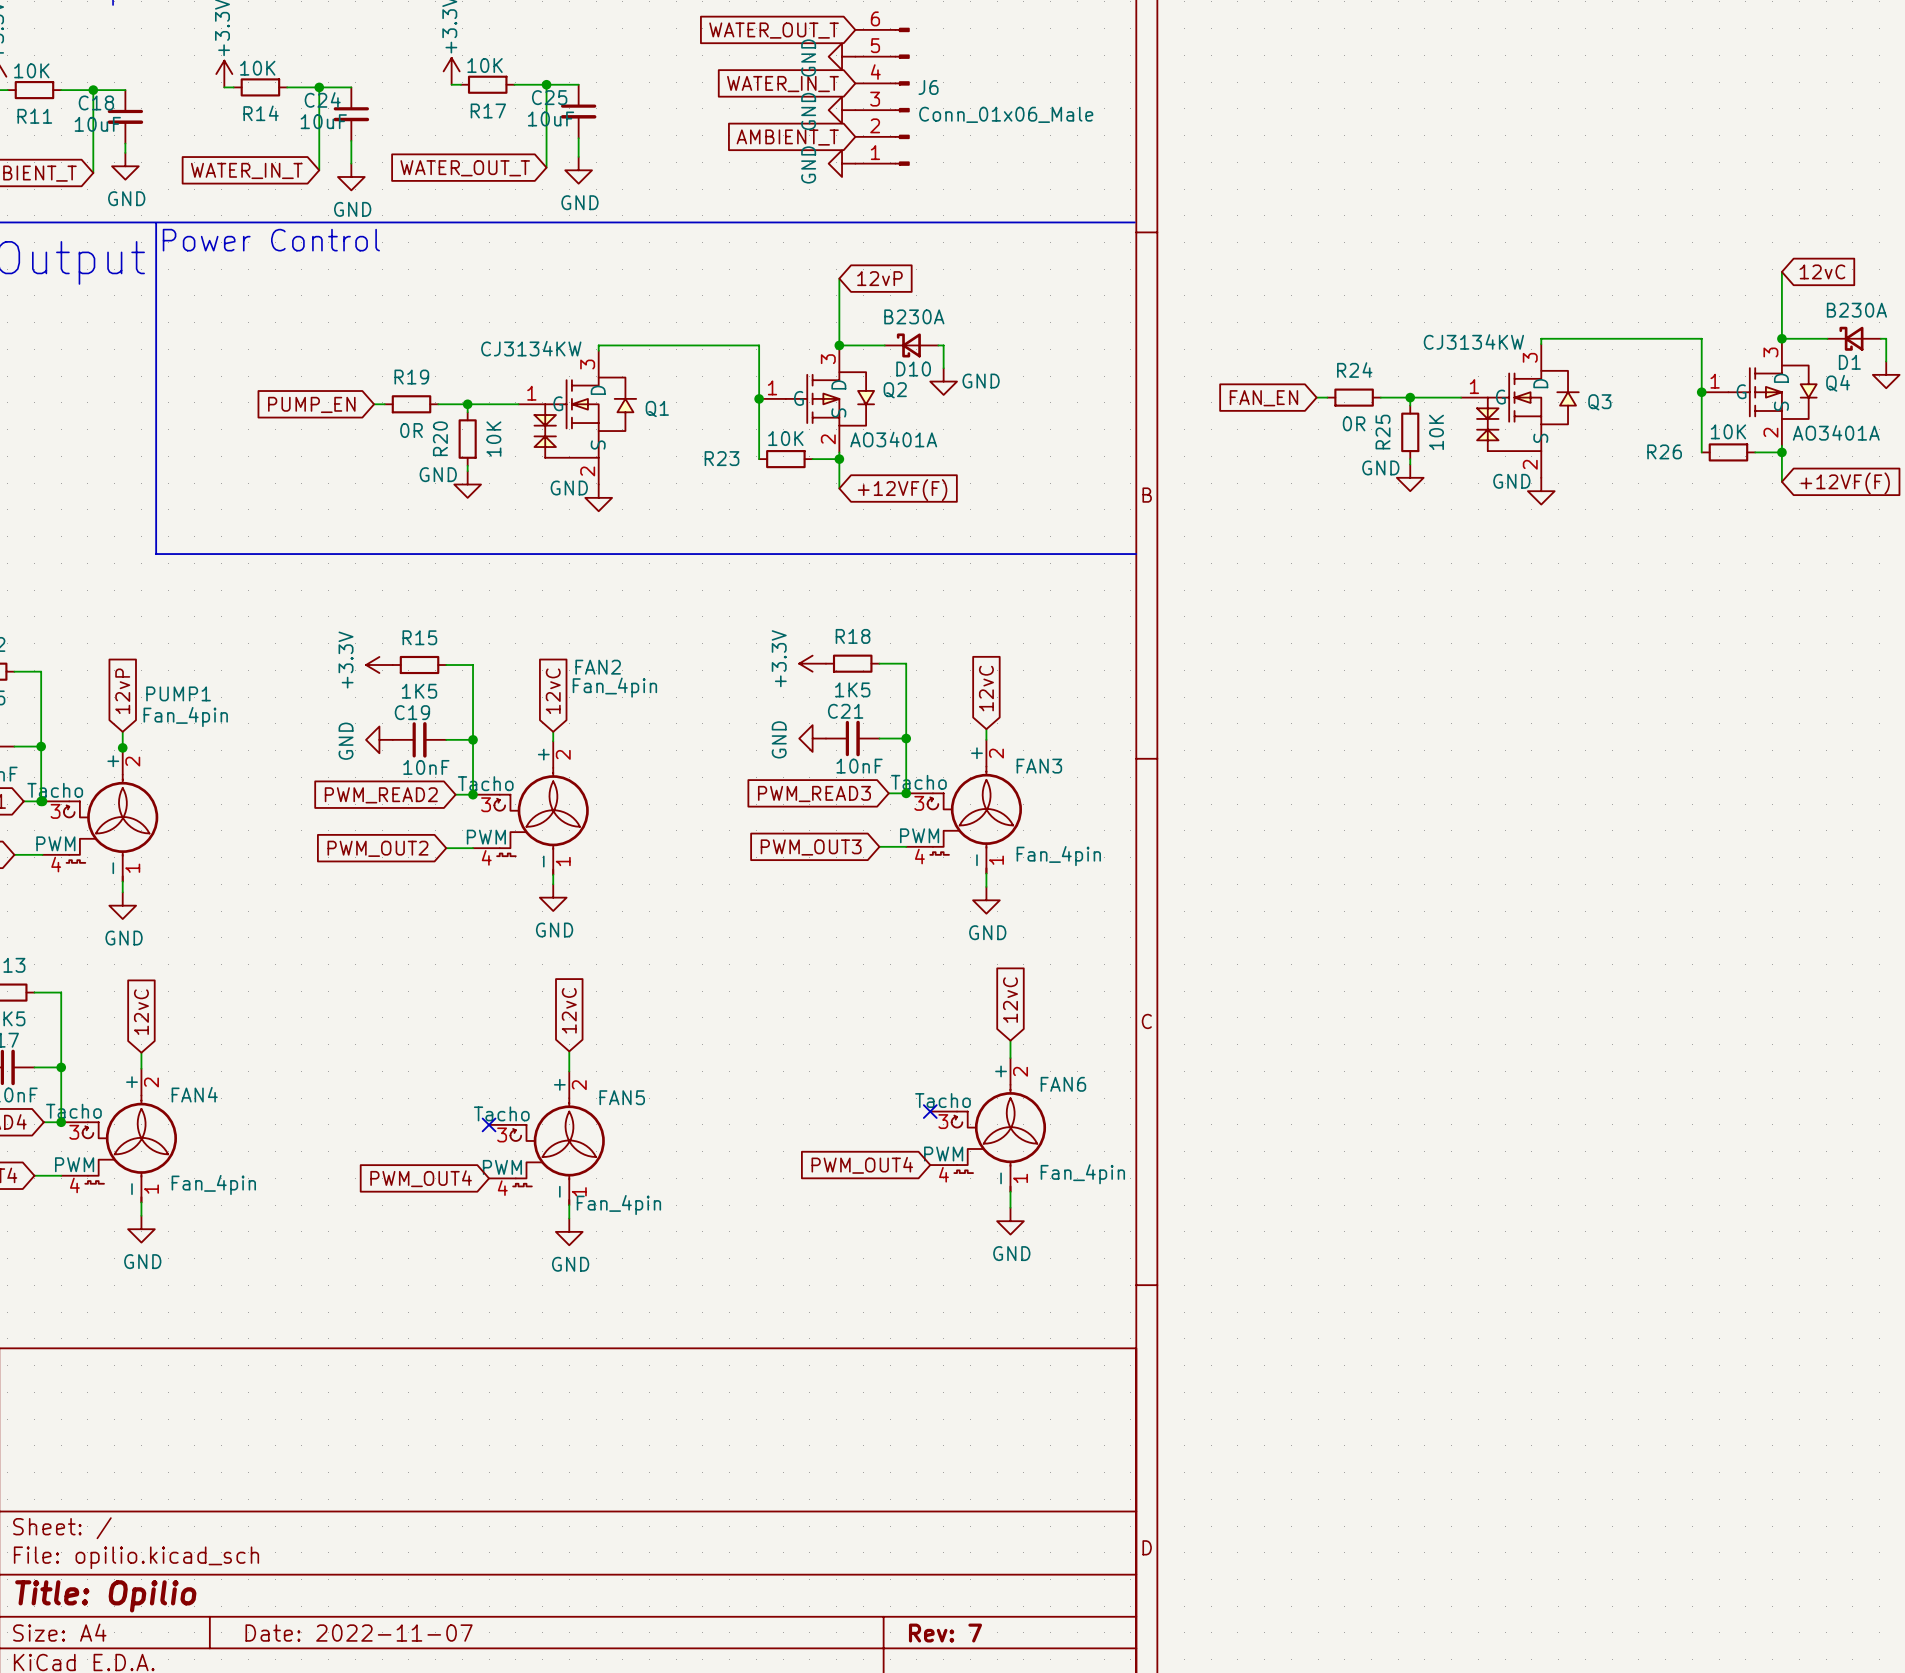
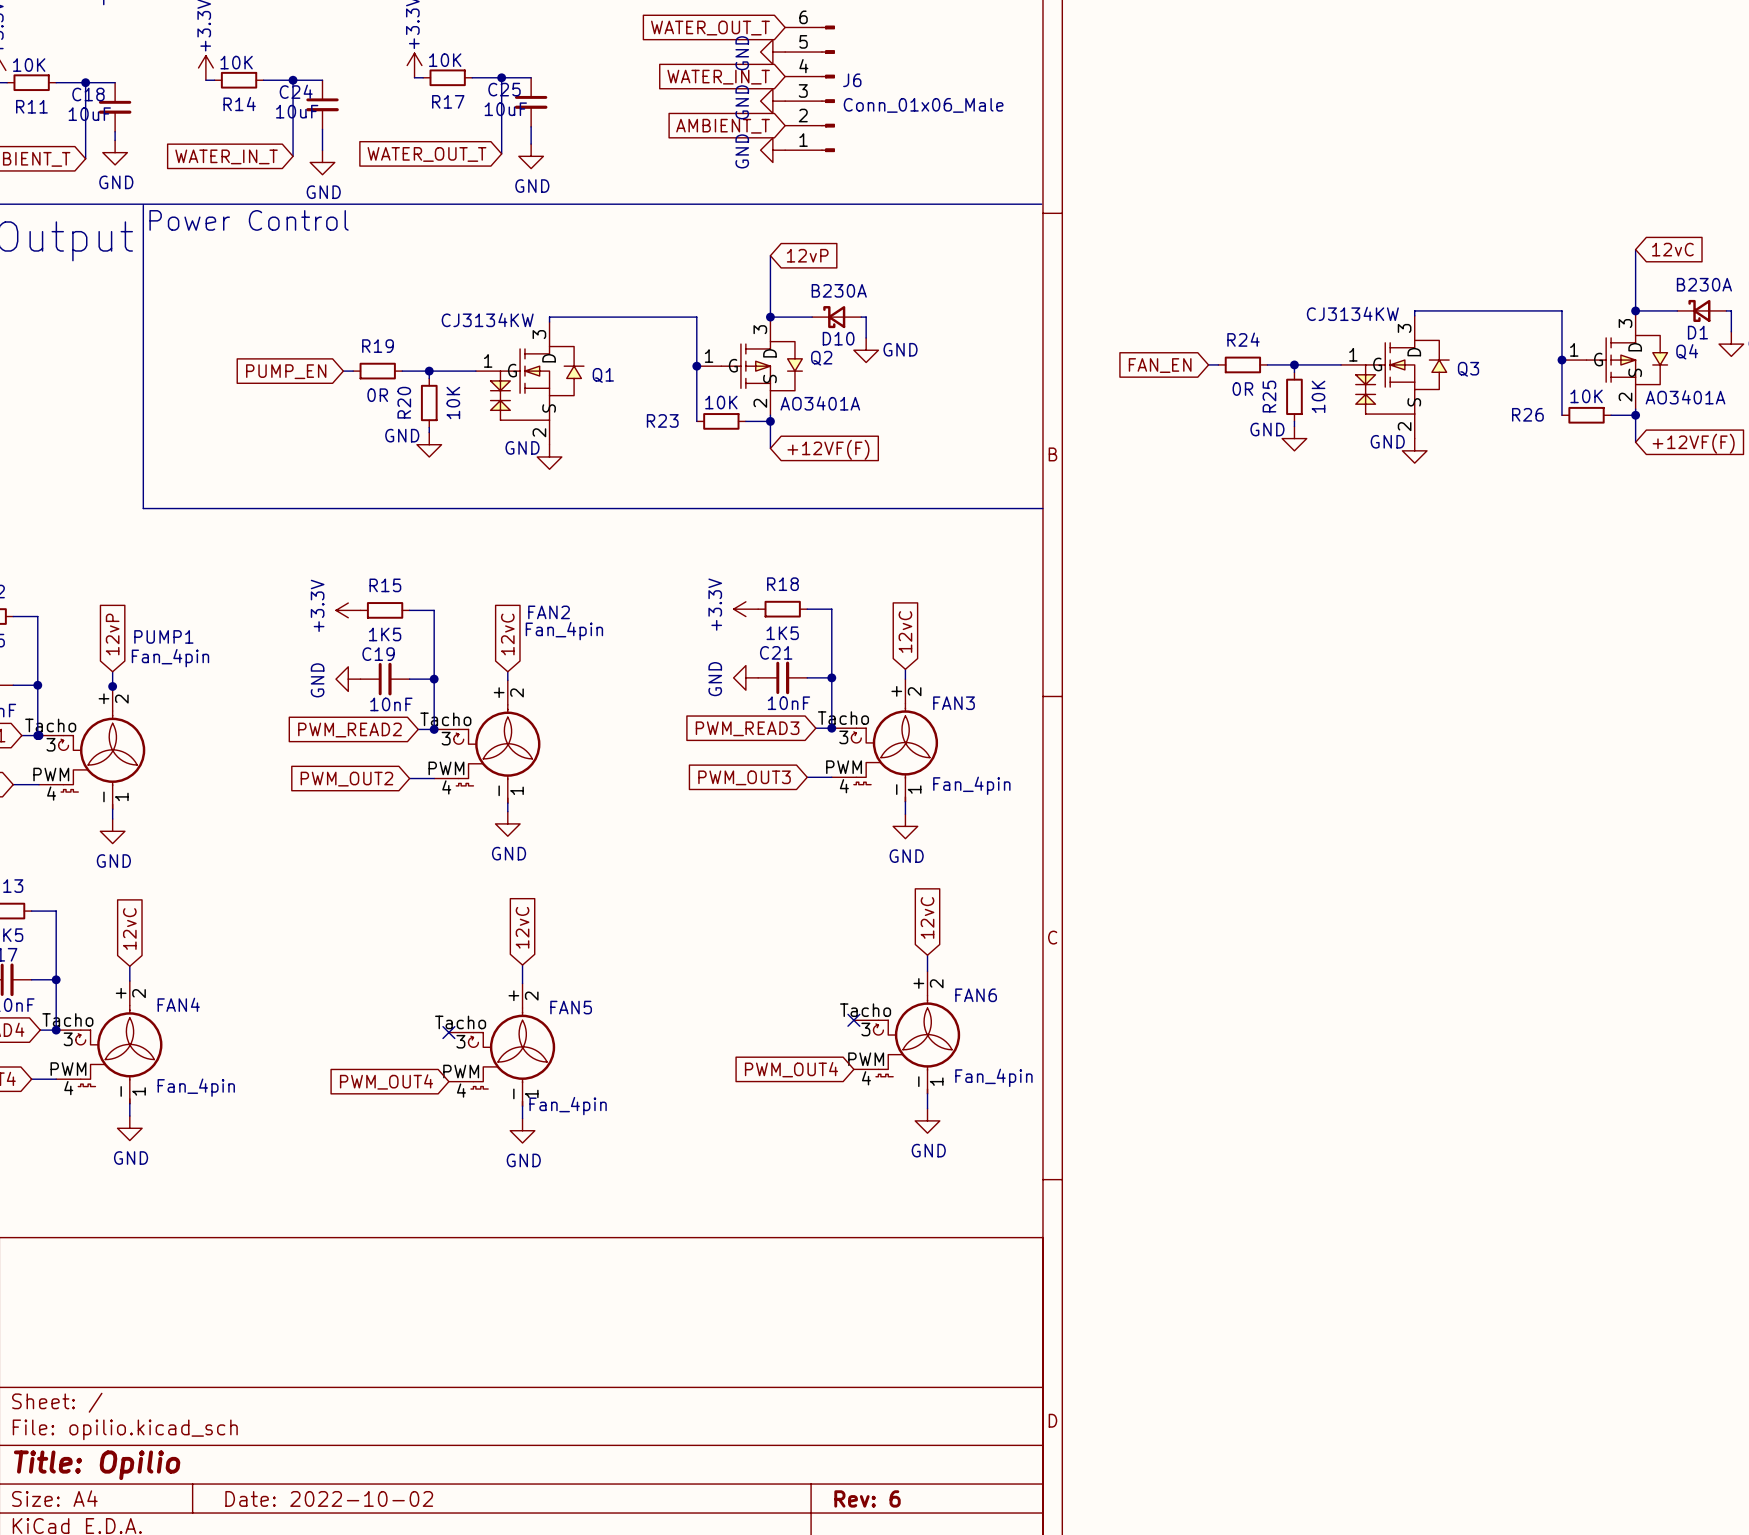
title block: Date: 2022-11-07 (359, 1633) -> Date: 2022-10-02 (329, 1498)
title block: Rev: 7 (945, 1633) -> Rev: 6 (867, 1498)

